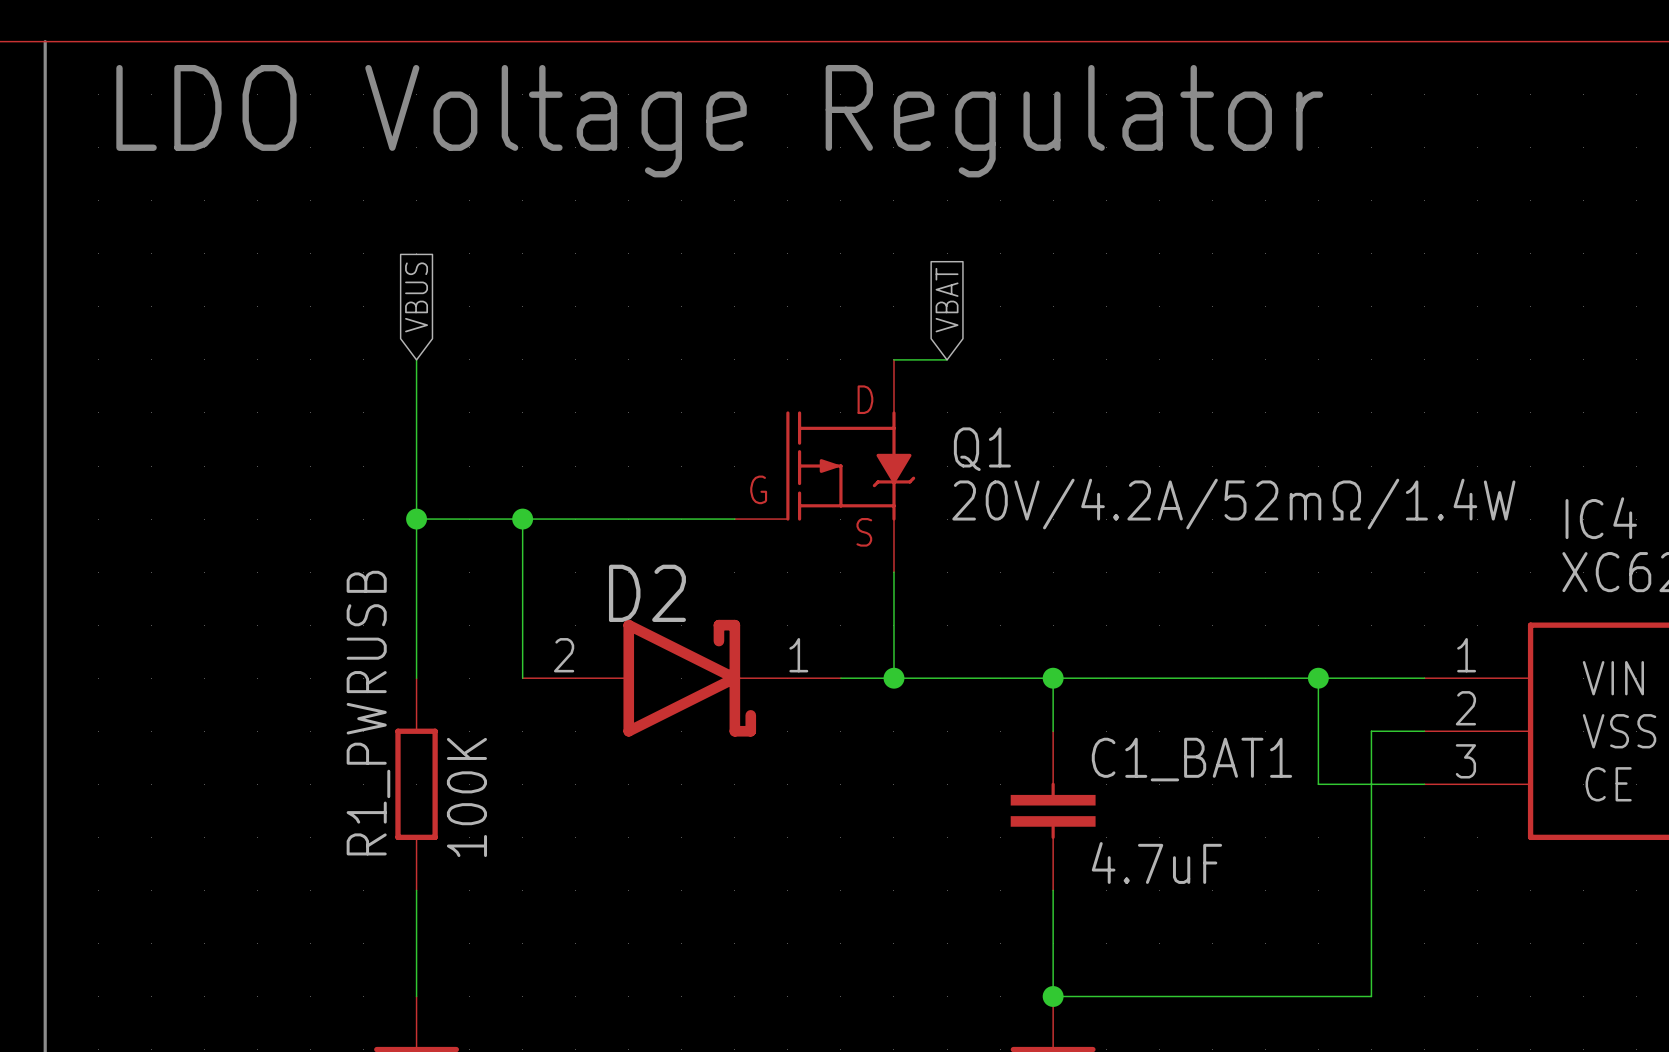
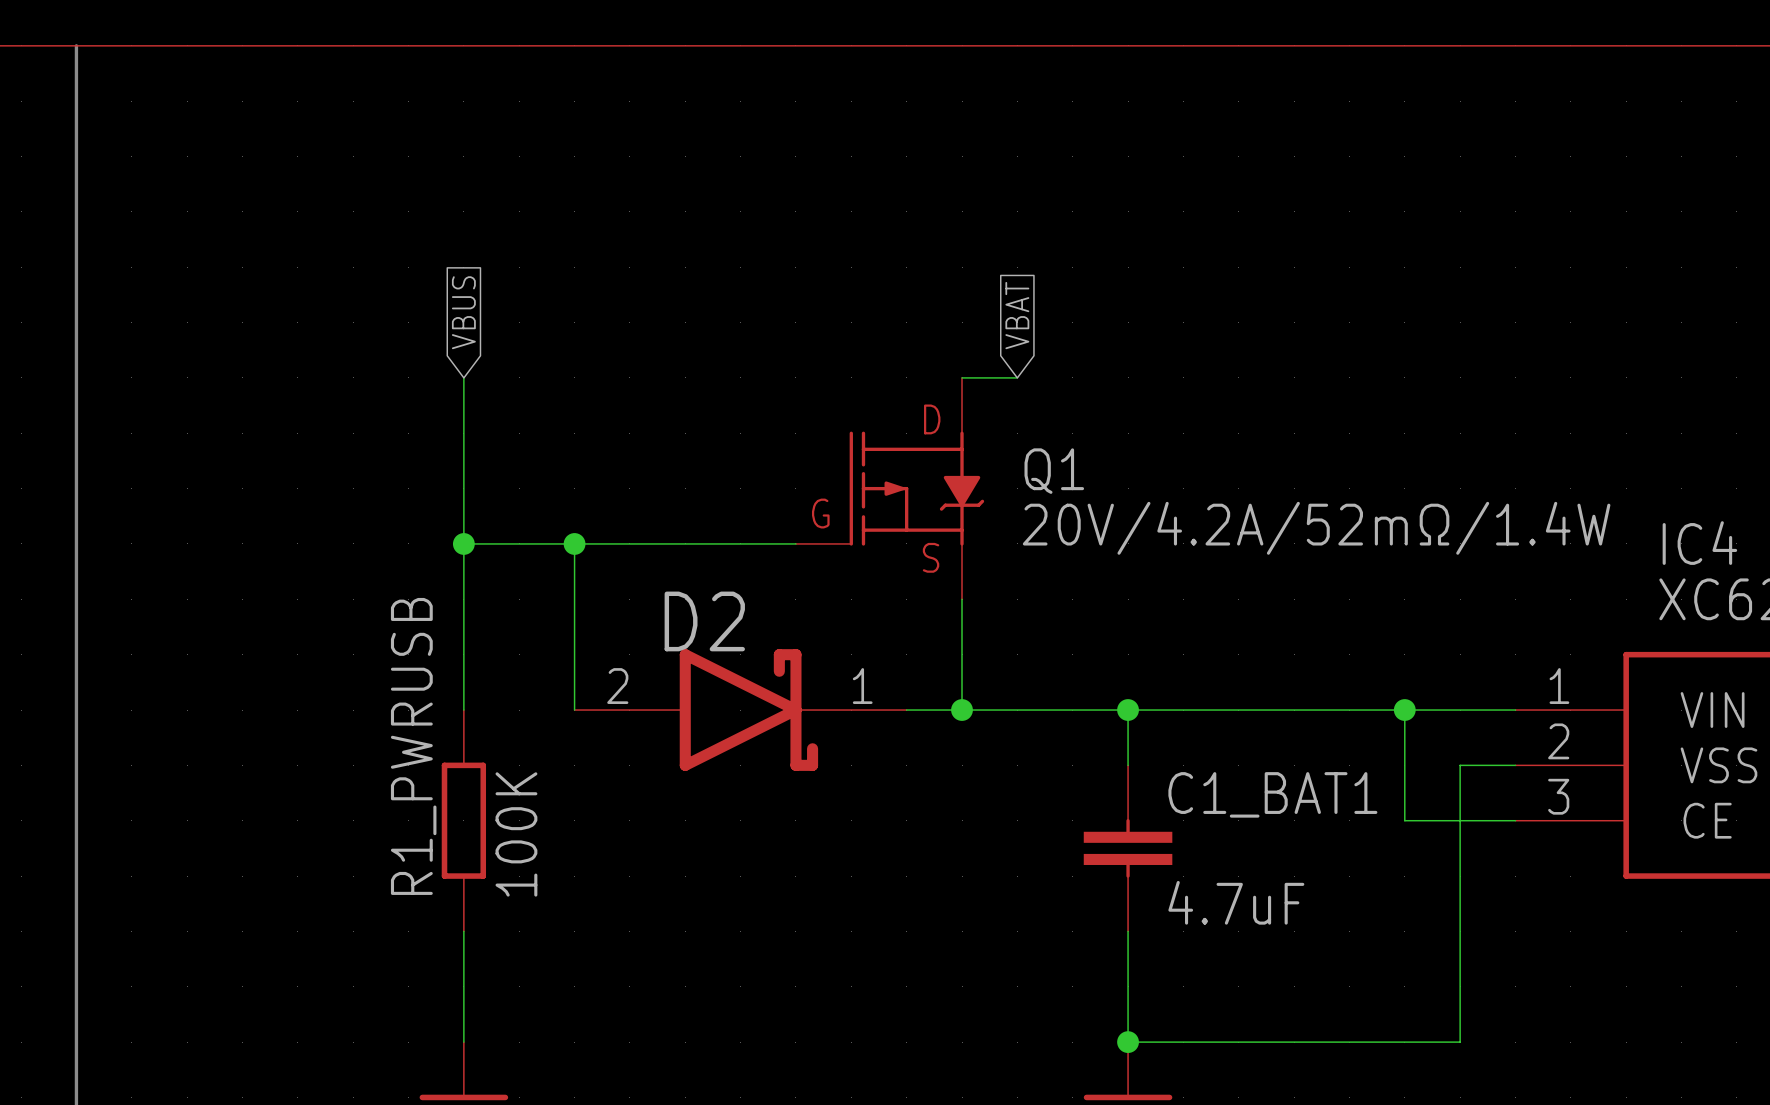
text: LDO Voltage Regulator (719, 121) -> none

